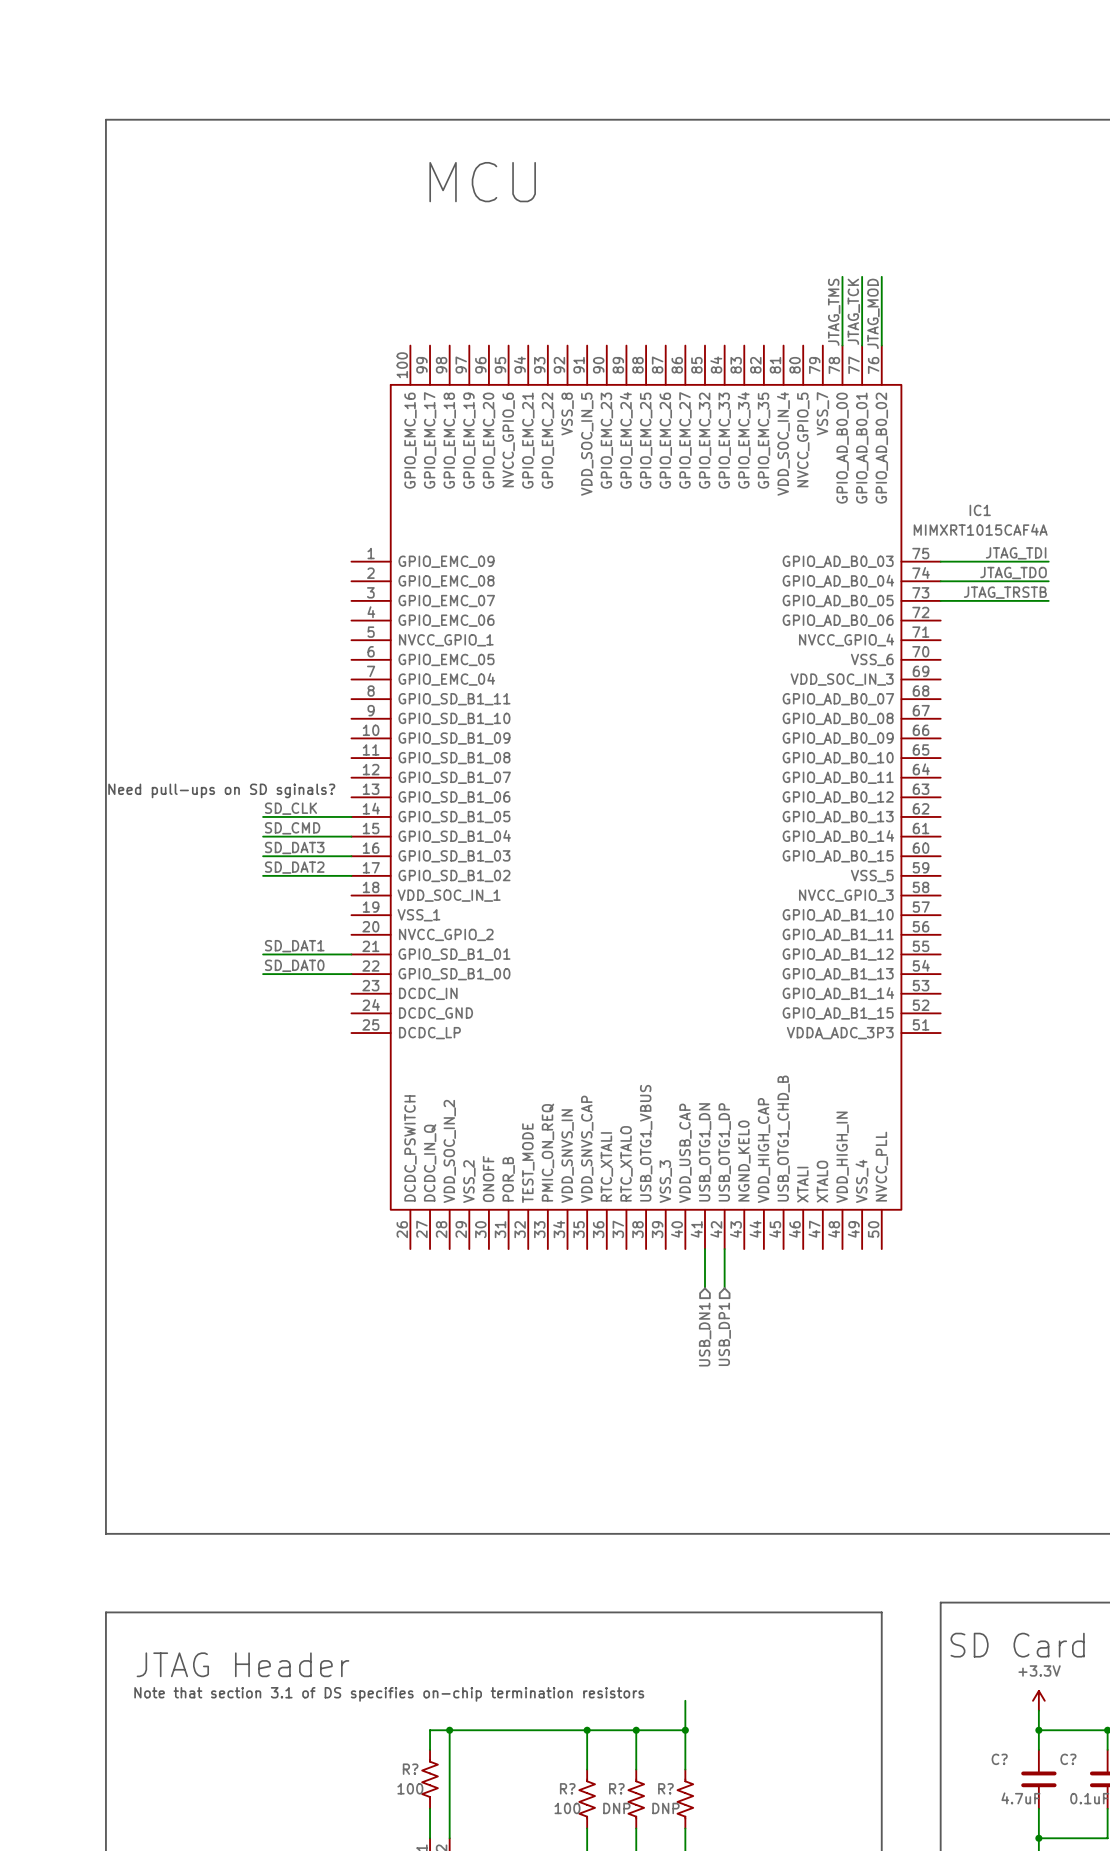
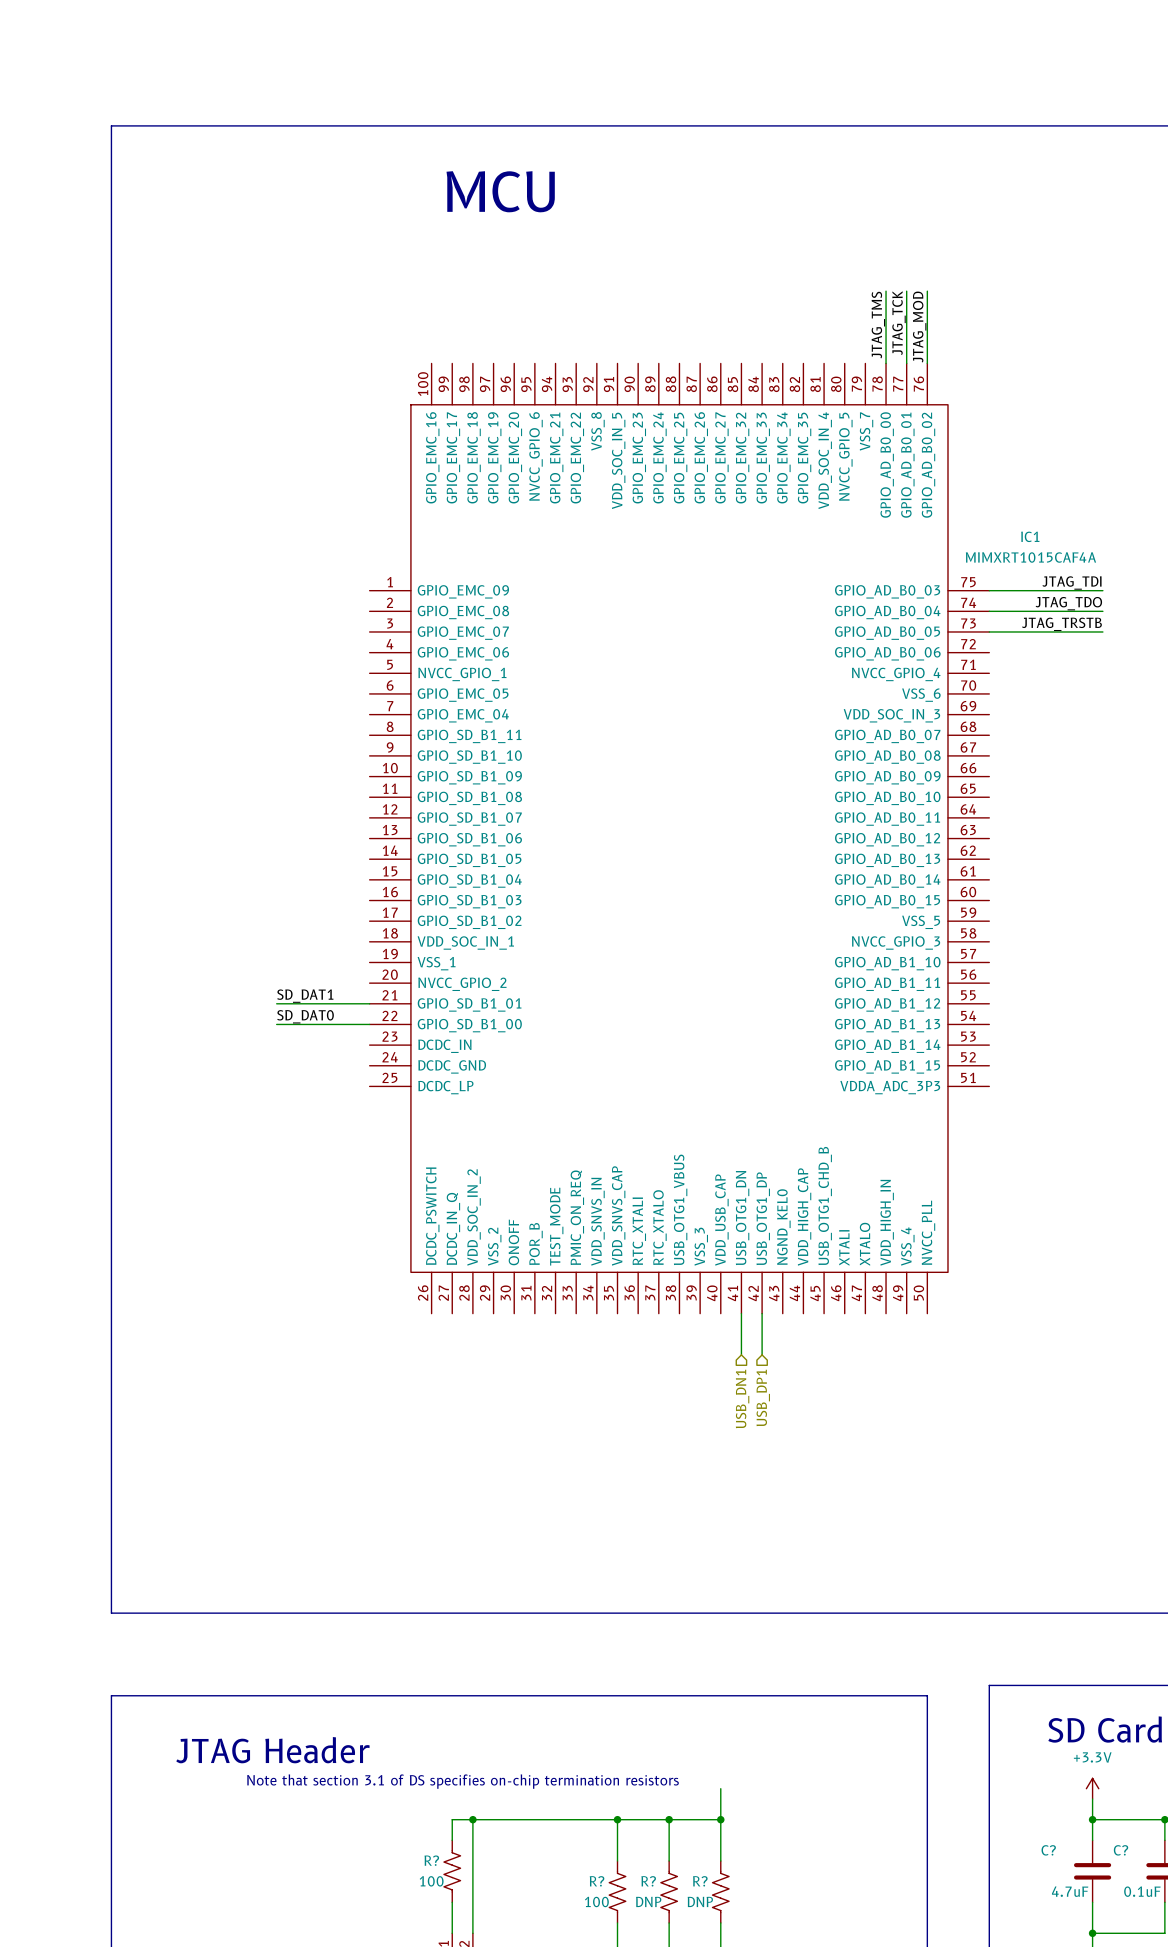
text: Need pull-ups on SD sginals? (221, 790) -> none
label: SD_CLK (290, 808) -> none
wire: (263, 816) (351, 816) -> none
label: SD_CMD (292, 828) -> none
wire: (263, 836) (351, 836) -> none
label: SD_DAT3 (294, 847) -> none
wire: (263, 856) (351, 856) -> none
label: SD_DAT2 (294, 867) -> none
wire: (263, 875) (351, 875) -> none

